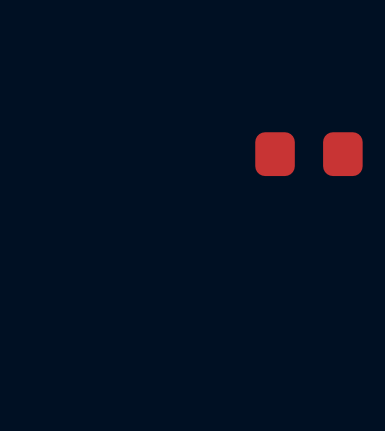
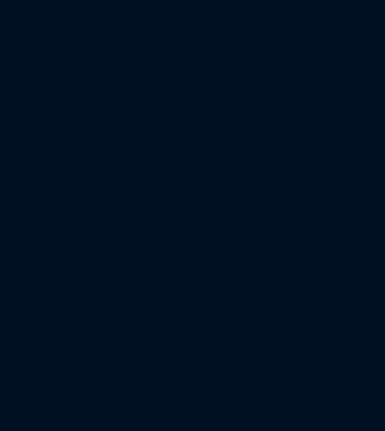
part: (308, 154) -> none

